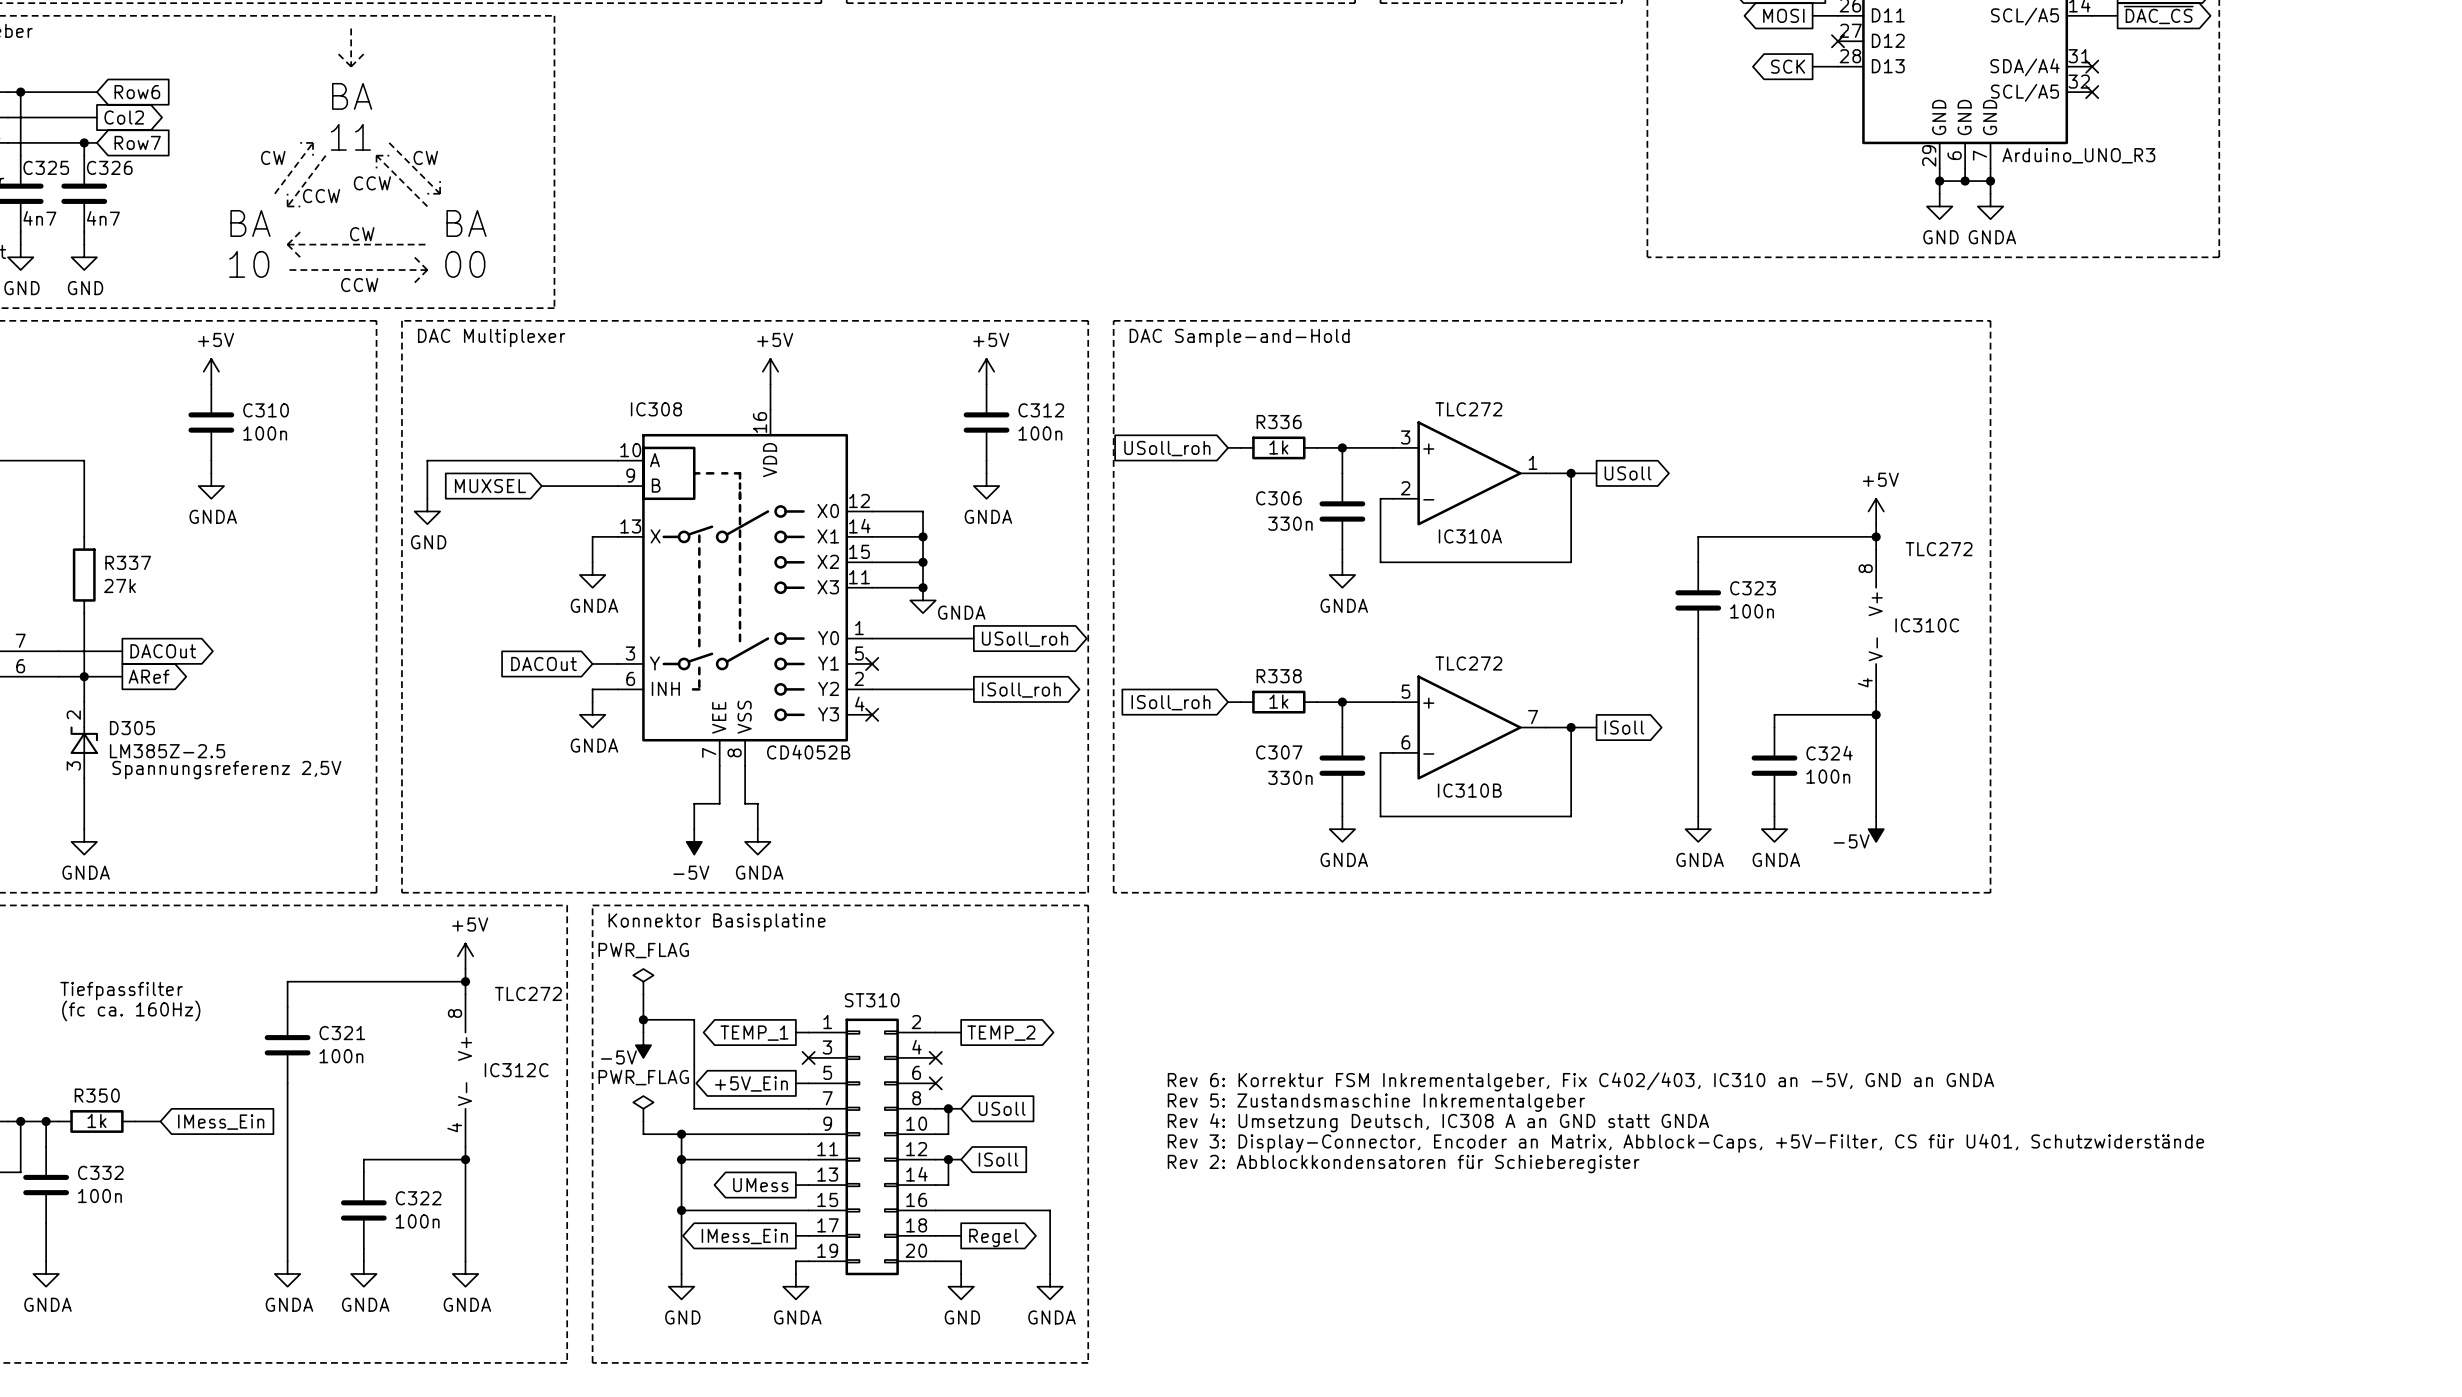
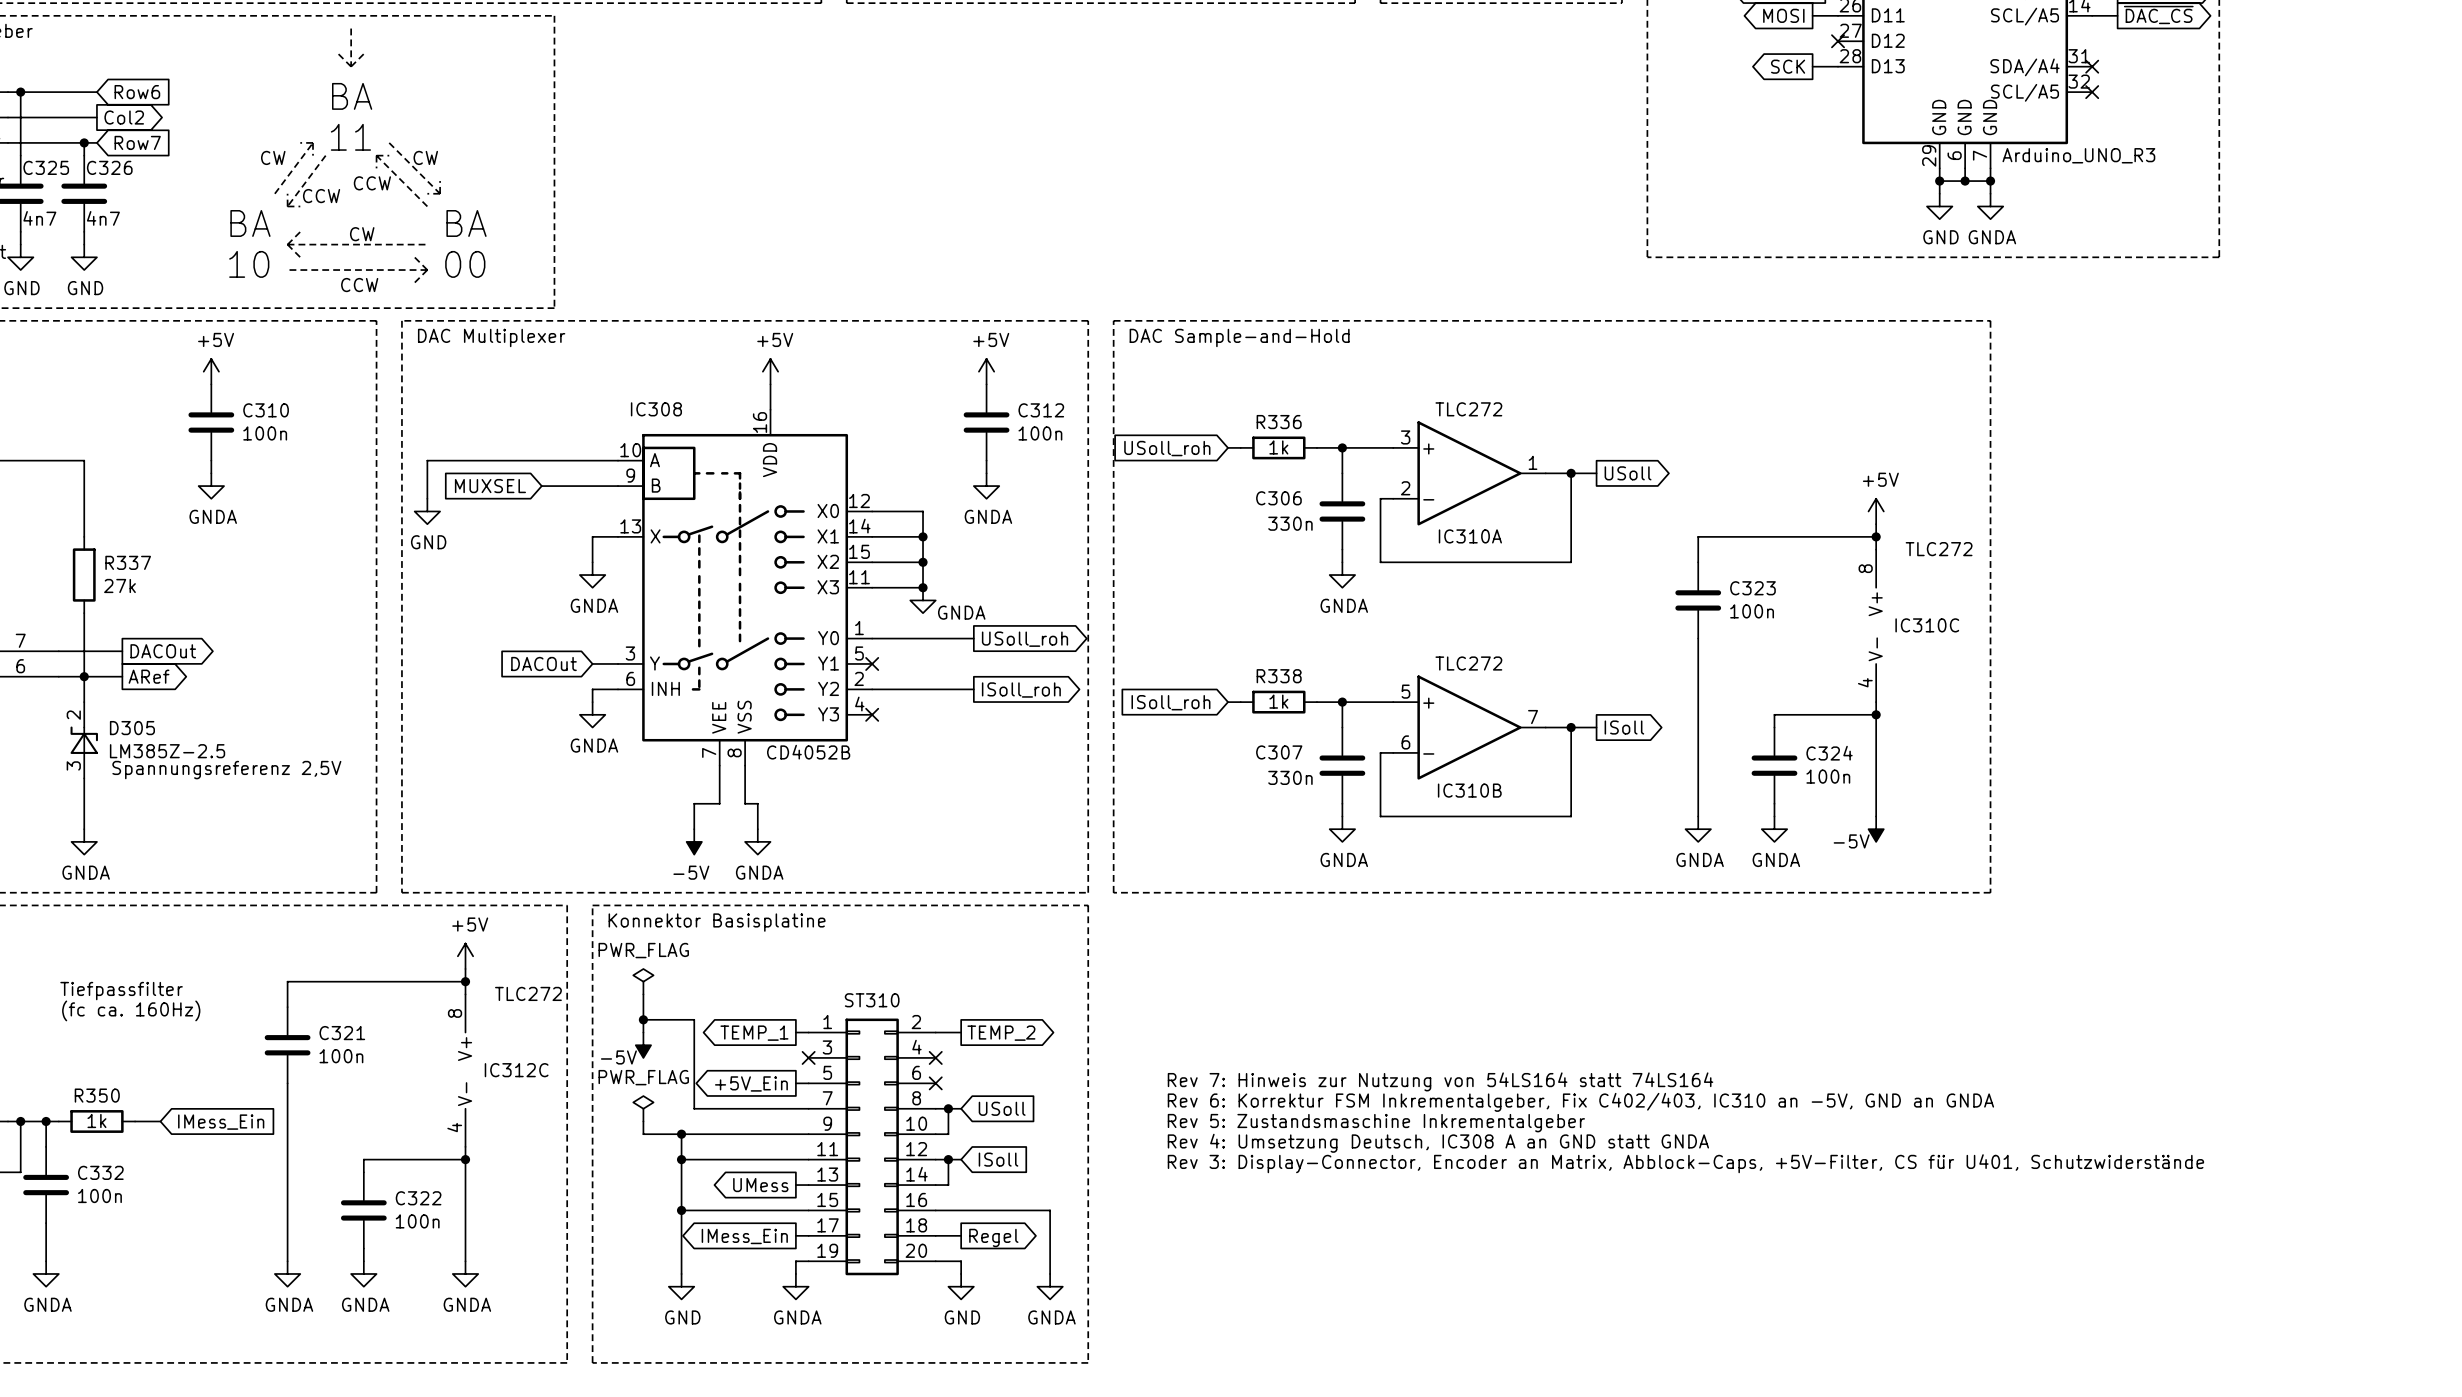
text: Rev 6: Korrektur FSM Inkrementalgeber, Fix C402/403, IC310 an -5V, GND an GNDA (1580, 1081) -> Rev 7: Hinweis zur Nutzung von 54LS164 statt 74LS164 (1440, 1081)
text: Rev 5: Zustandsmaschine Inkrementalgeber (1376, 1102) -> Rev 6: Korrektur FSM Inkrementalgeber, Fix C402/403, IC310 an -5V, GND an GNDA (1580, 1102)
text: Rev 4: Umsetzung Deutsch, IC308 A an GND statt GNDA (1438, 1122) -> Rev 5: Zustandsmaschine Inkrementalgeber (1376, 1123)
text: Rev 3: Display-Connector, Encoder an Matrix, Abblock-Caps, +5V-Filter, CS für U401, Schutzwiderstände (1685, 1143) -> Rev 4: Umsetzung Deutsch, IC308 A an GND statt GNDA (1438, 1143)
text: Rev 2: Abblockkondensatoren für Schieberegister (1403, 1164) -> Rev 3: Display-Connector, Encoder an Matrix, Abblock-Caps, +5V-Filter, CS für U401, Schutzwiderstände (1685, 1163)

